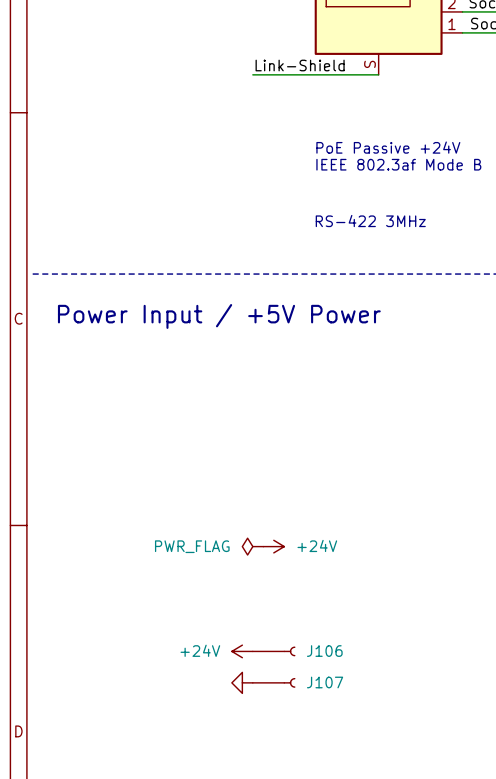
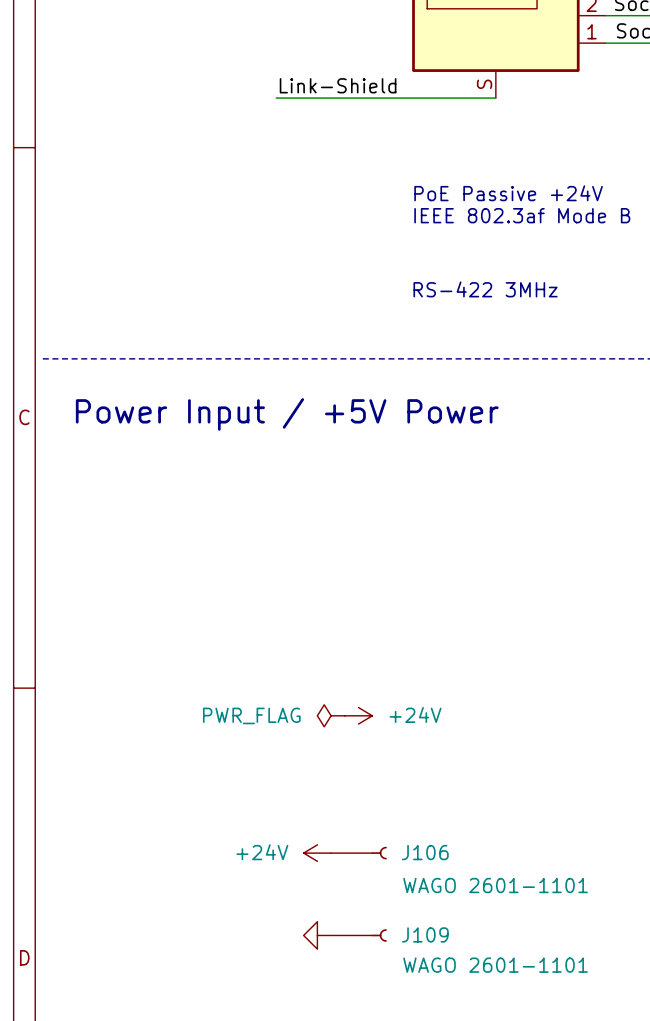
label position: Link-Shield (300, 65) -> Link-Shield (338, 85)
wire: none -> (276, 98) (331, 98)
J106 value: none -> WAGO 2601-1101 (495, 885)
power symbol position: (242, 682) -> (317, 935)
J107: (274, 682) -> none
J109: none -> WAGO 2601-1101 (358, 935)

